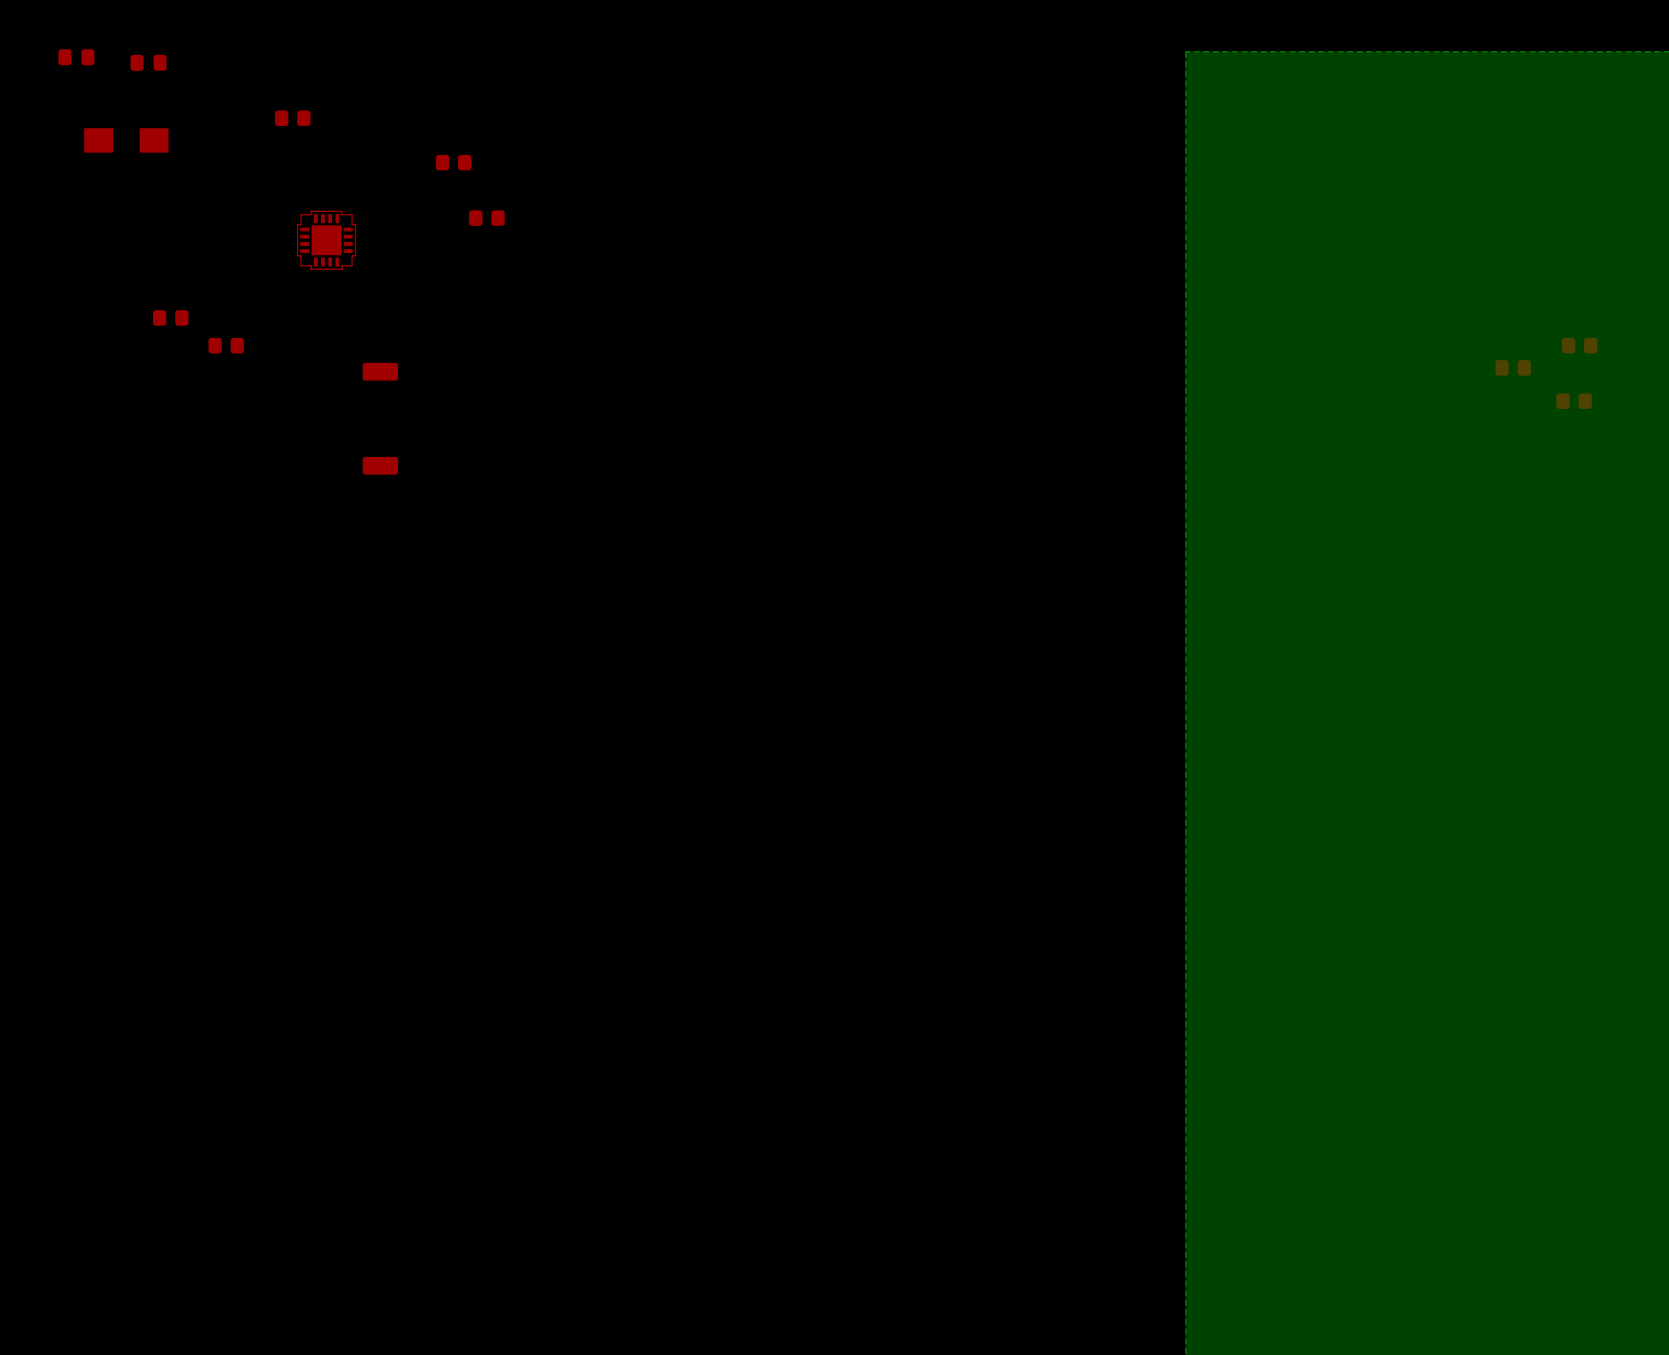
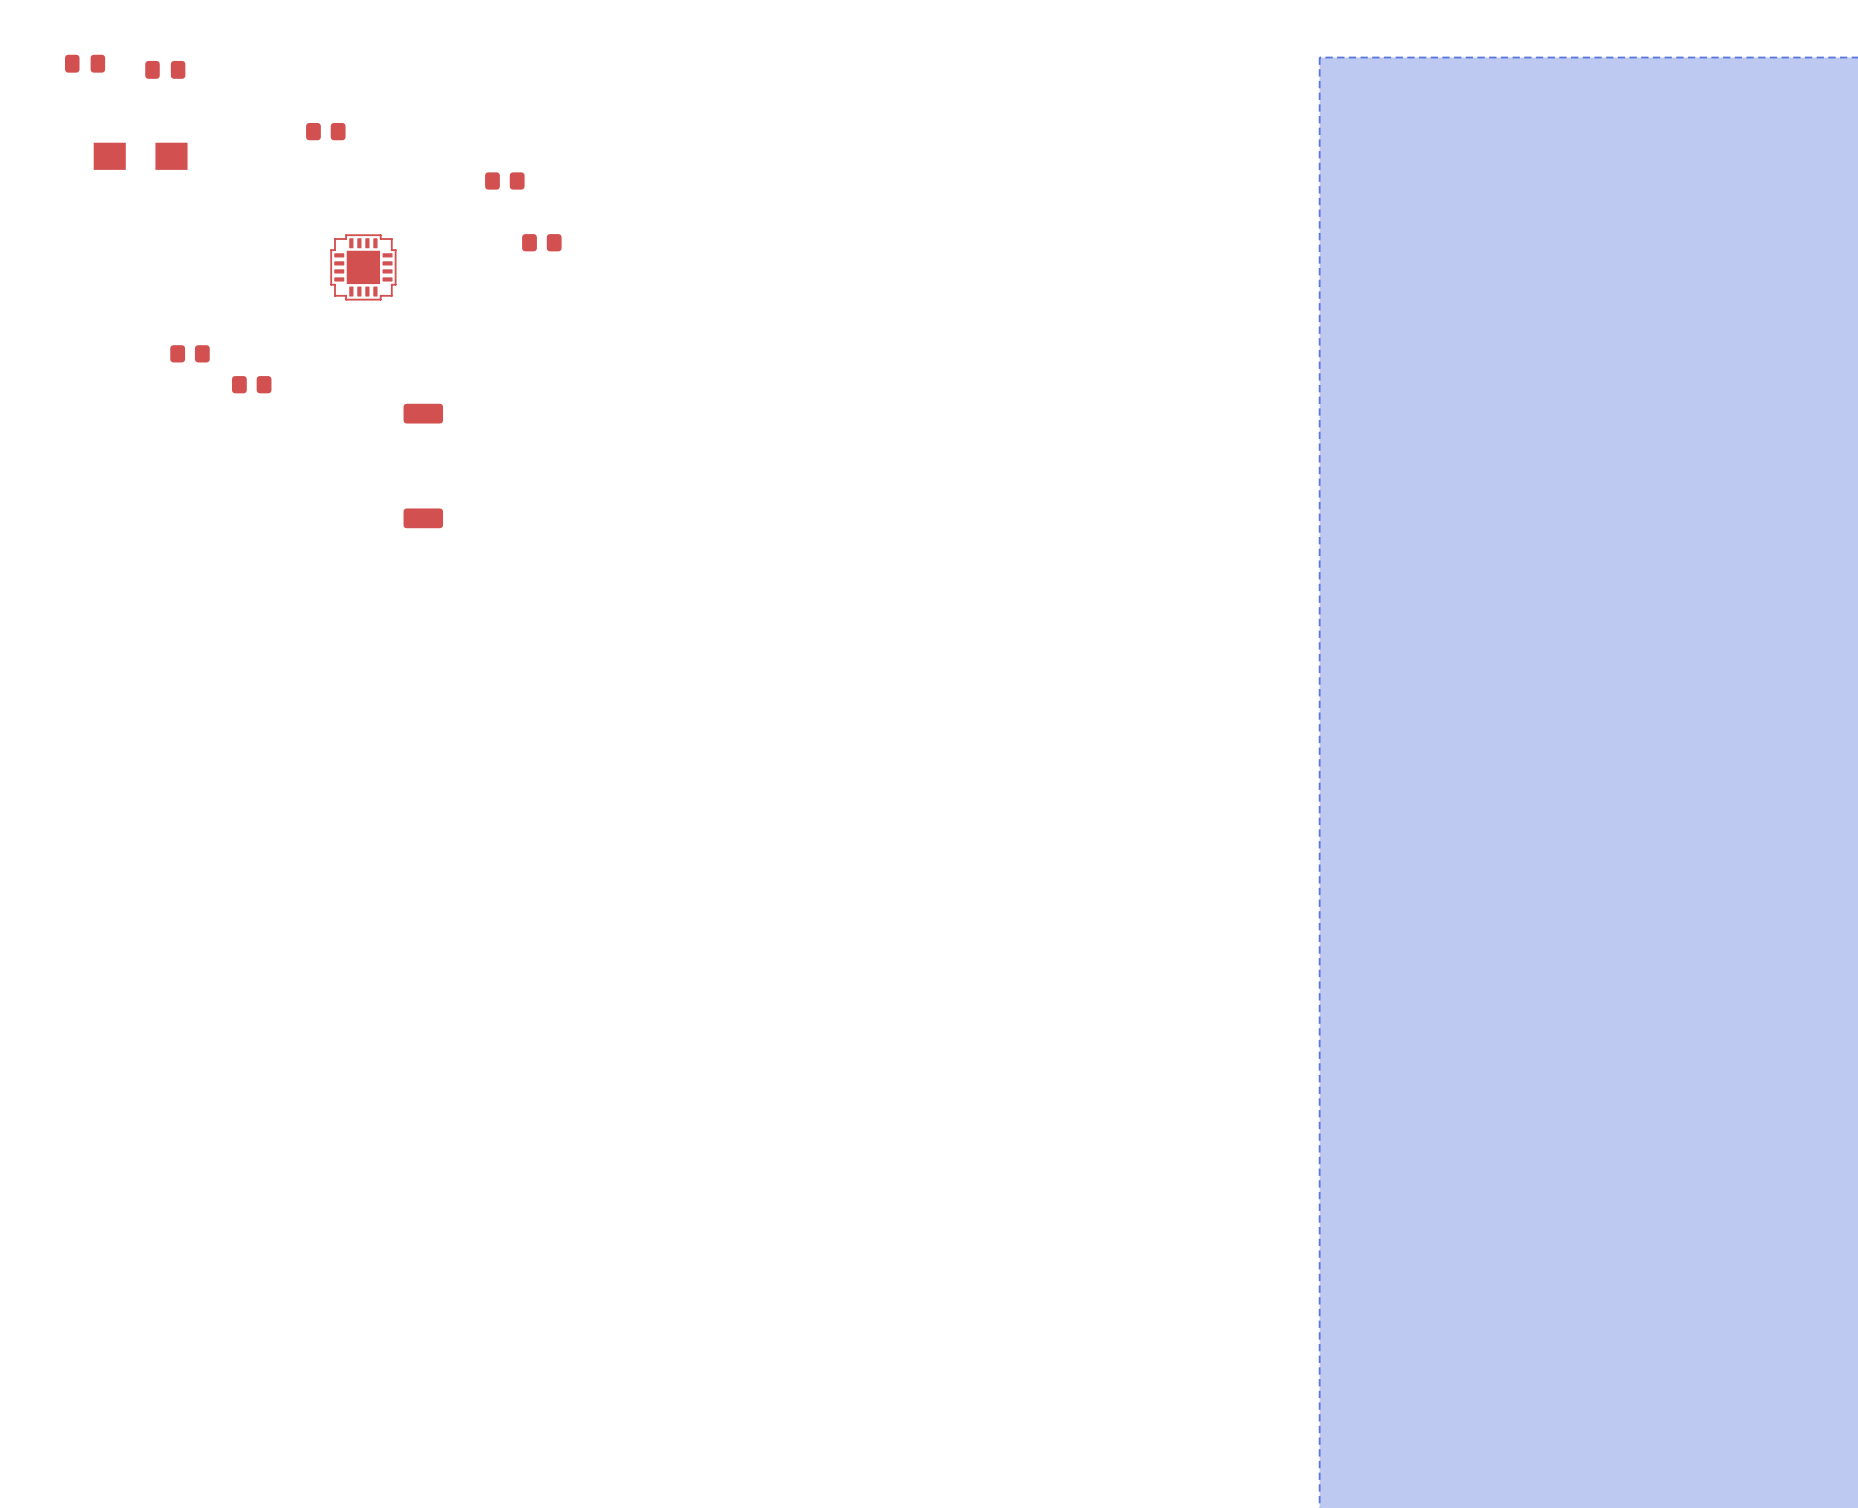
part: (1579, 345) -> none
part: (1513, 367) -> none
part: (1574, 401) -> none

